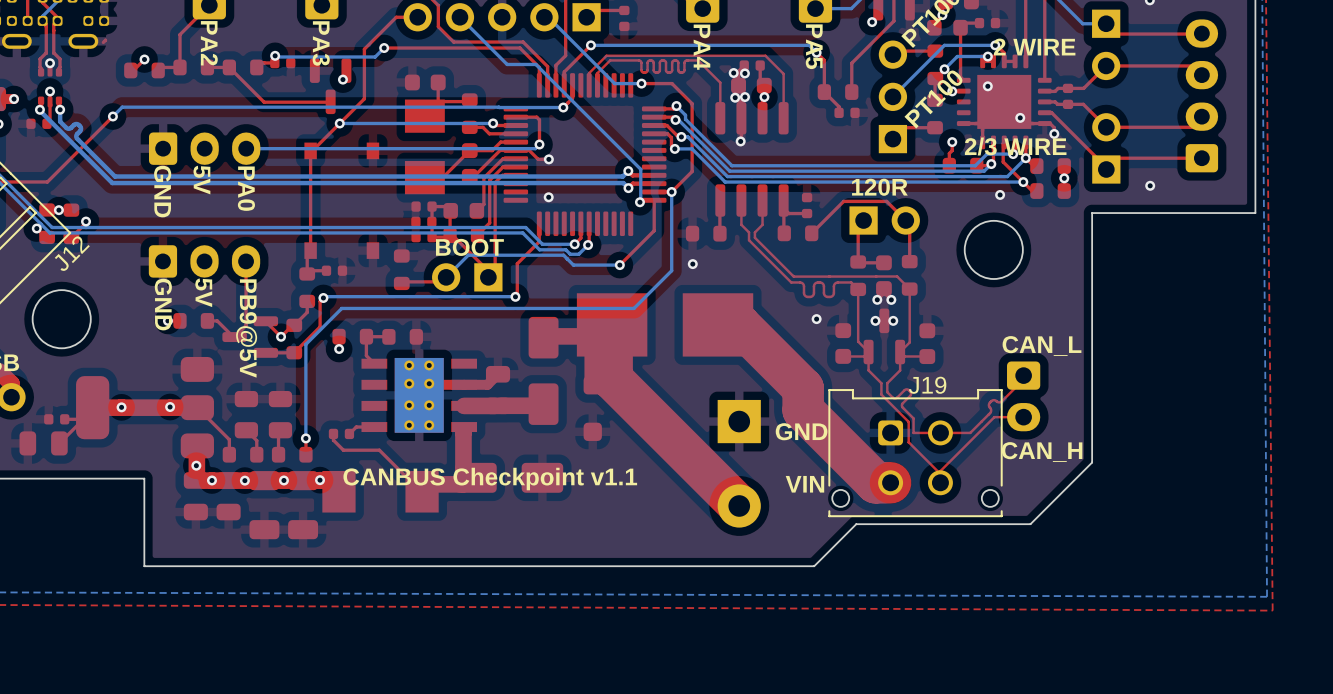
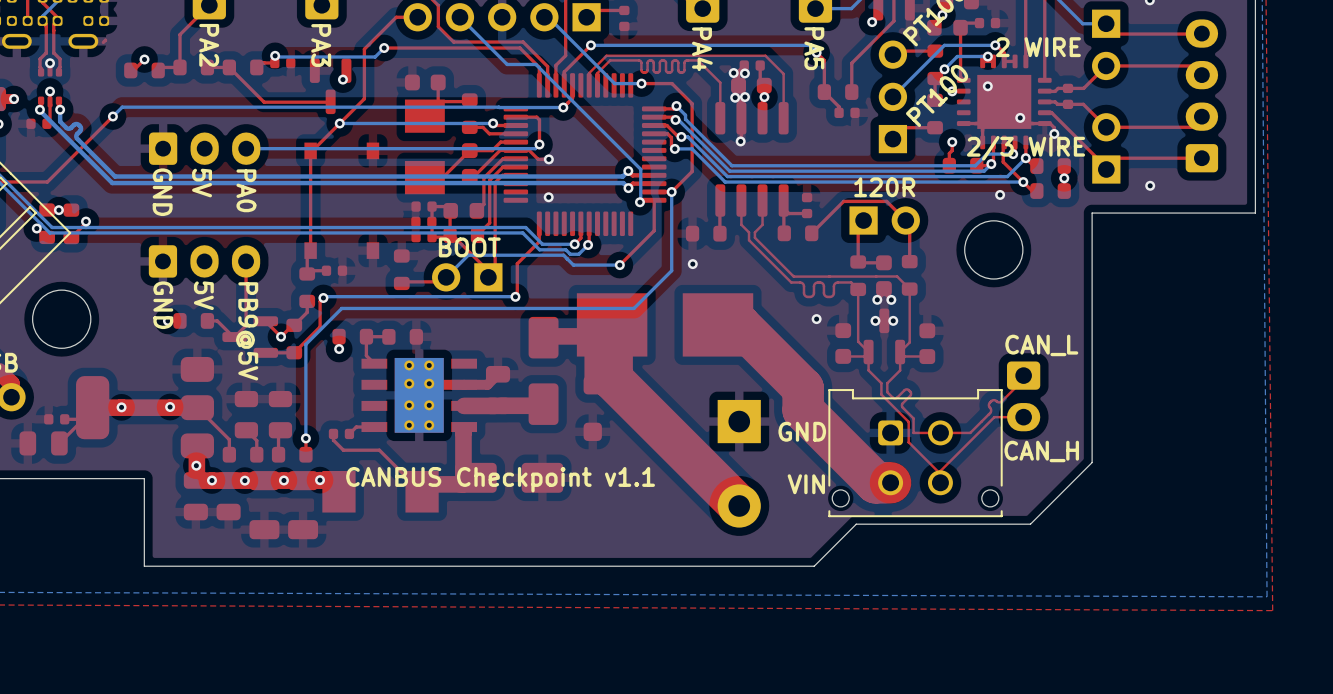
J12 name: J12 (72, 254) -> none
J19 name: J19 (927, 385) -> none

